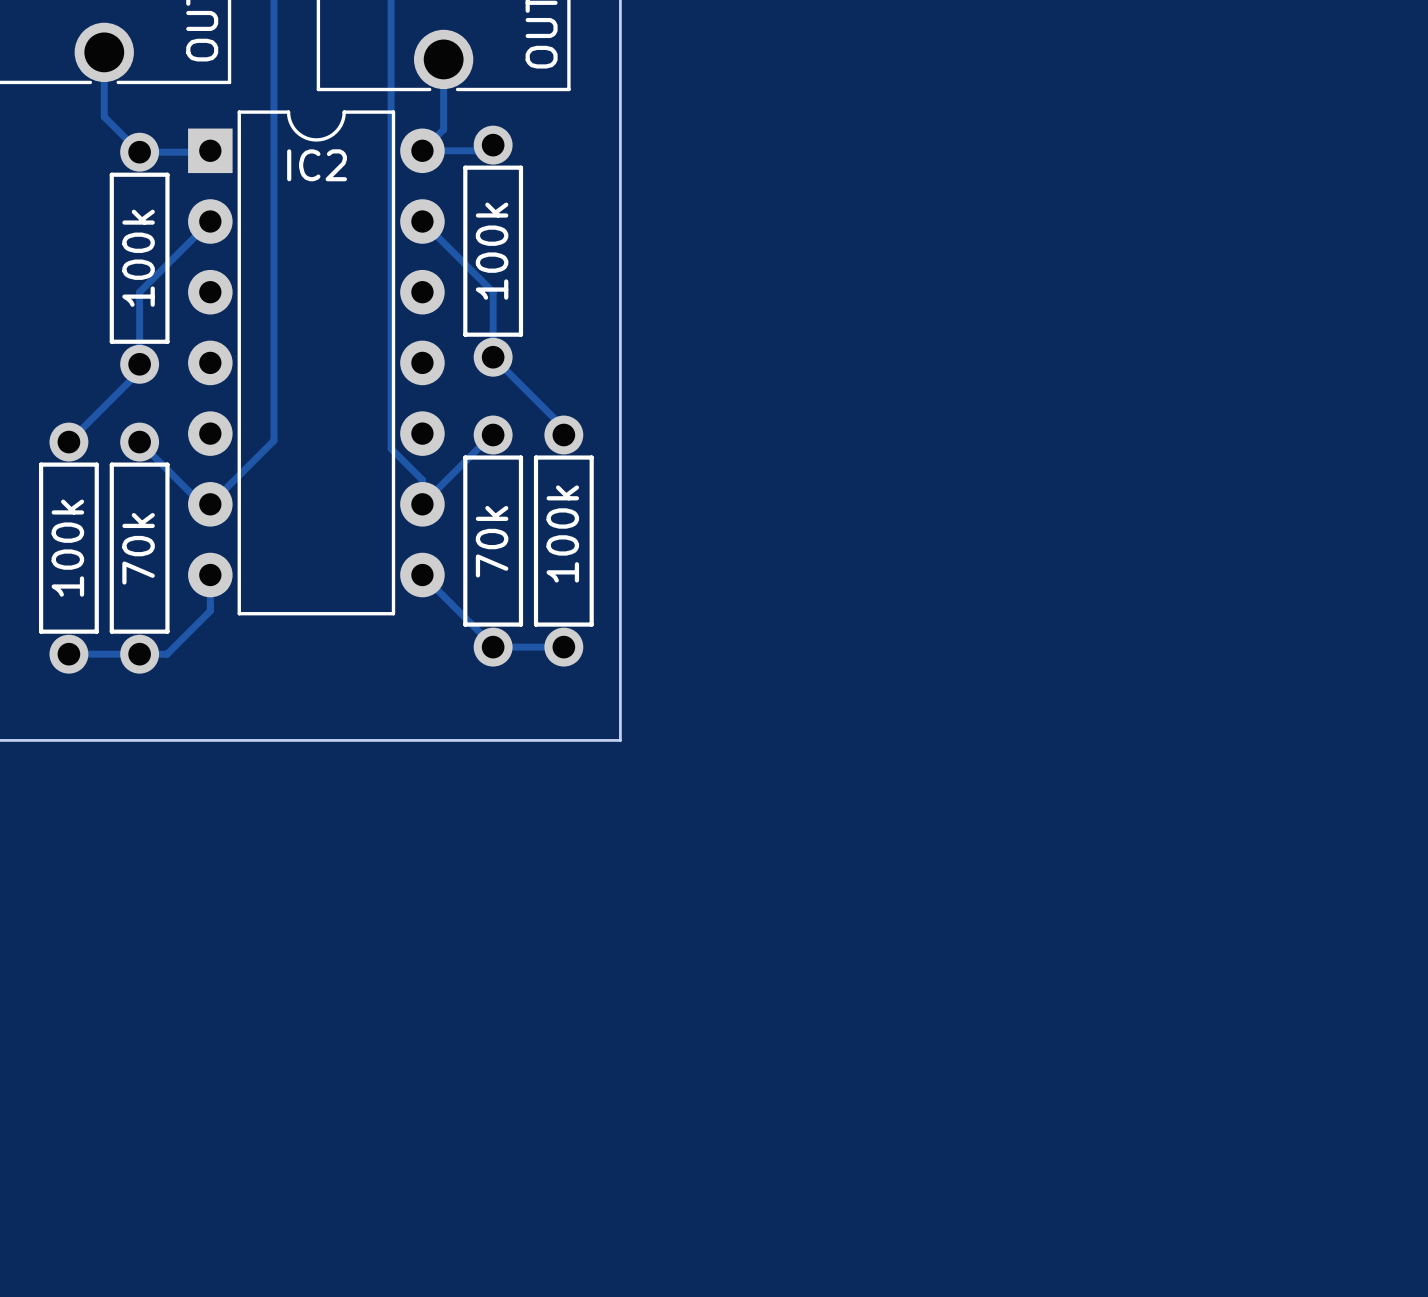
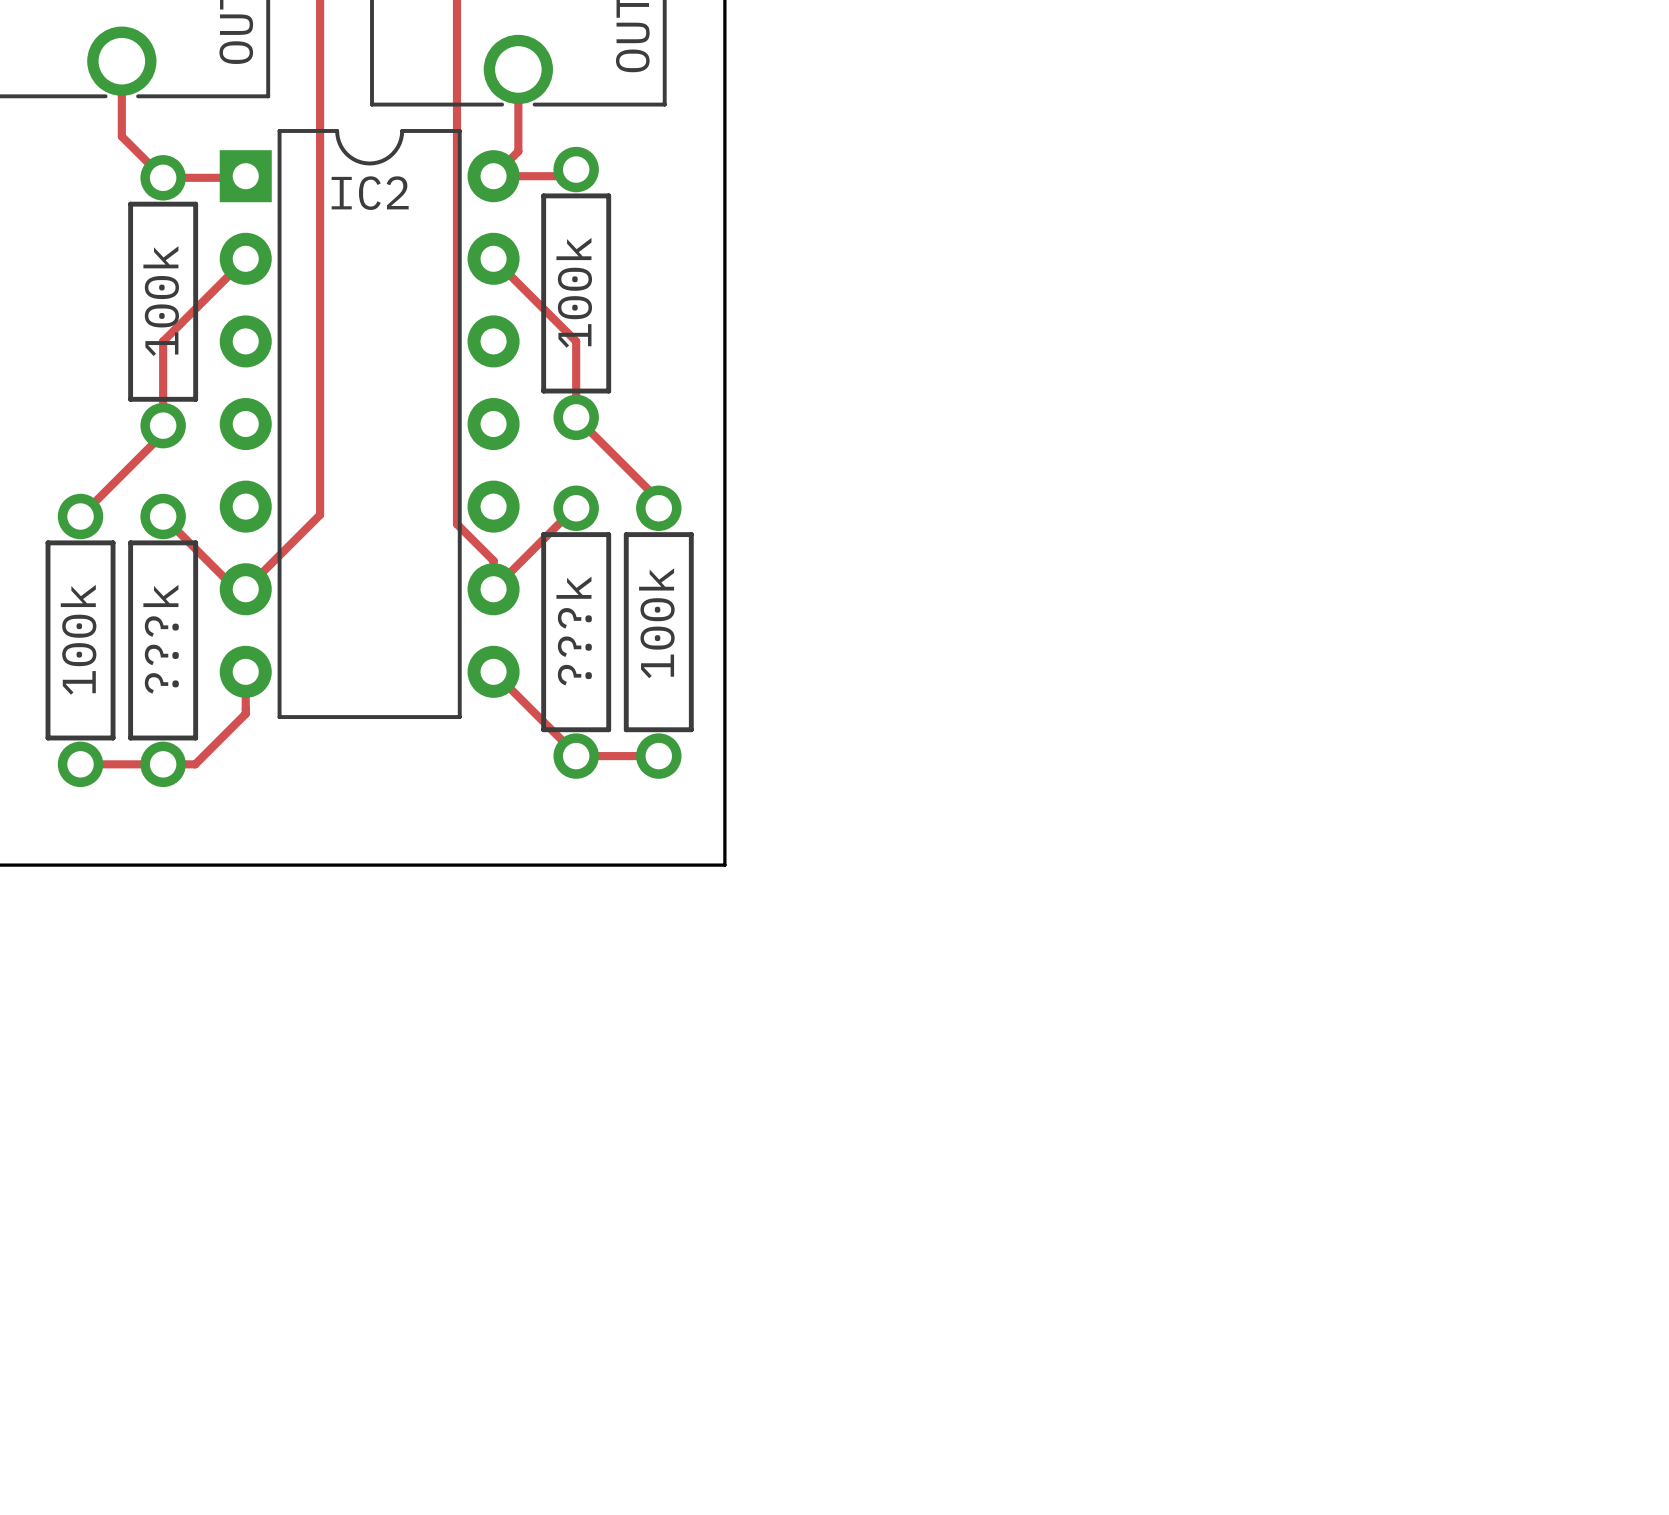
part value: 70k (492, 541) -> ???k (574, 630)
part value: 70k (138, 548) -> ???k (161, 639)

